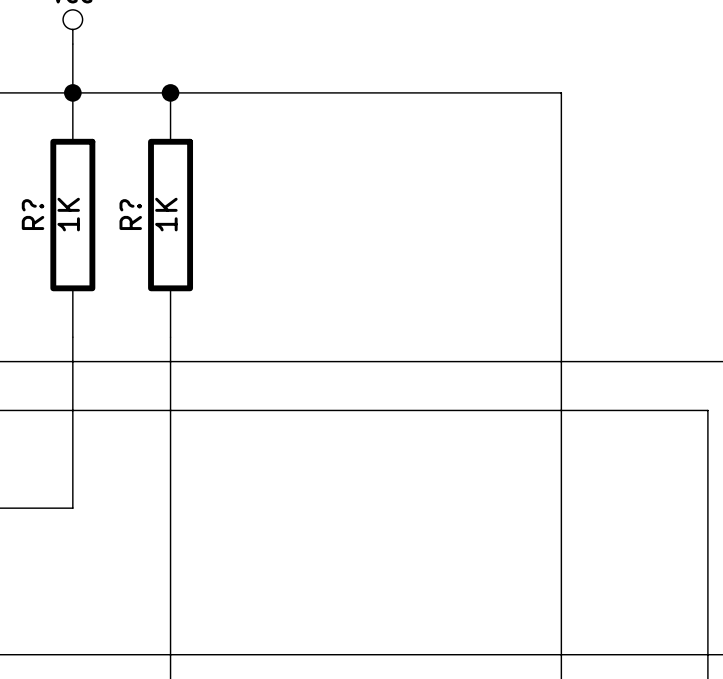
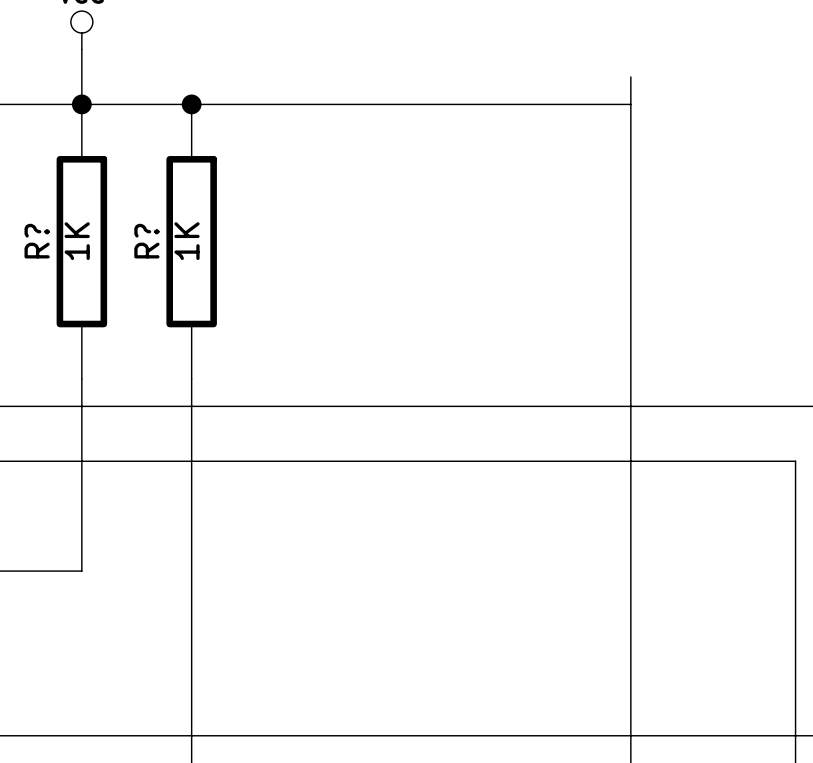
wire: none -> (630, 76) (630, 104)

